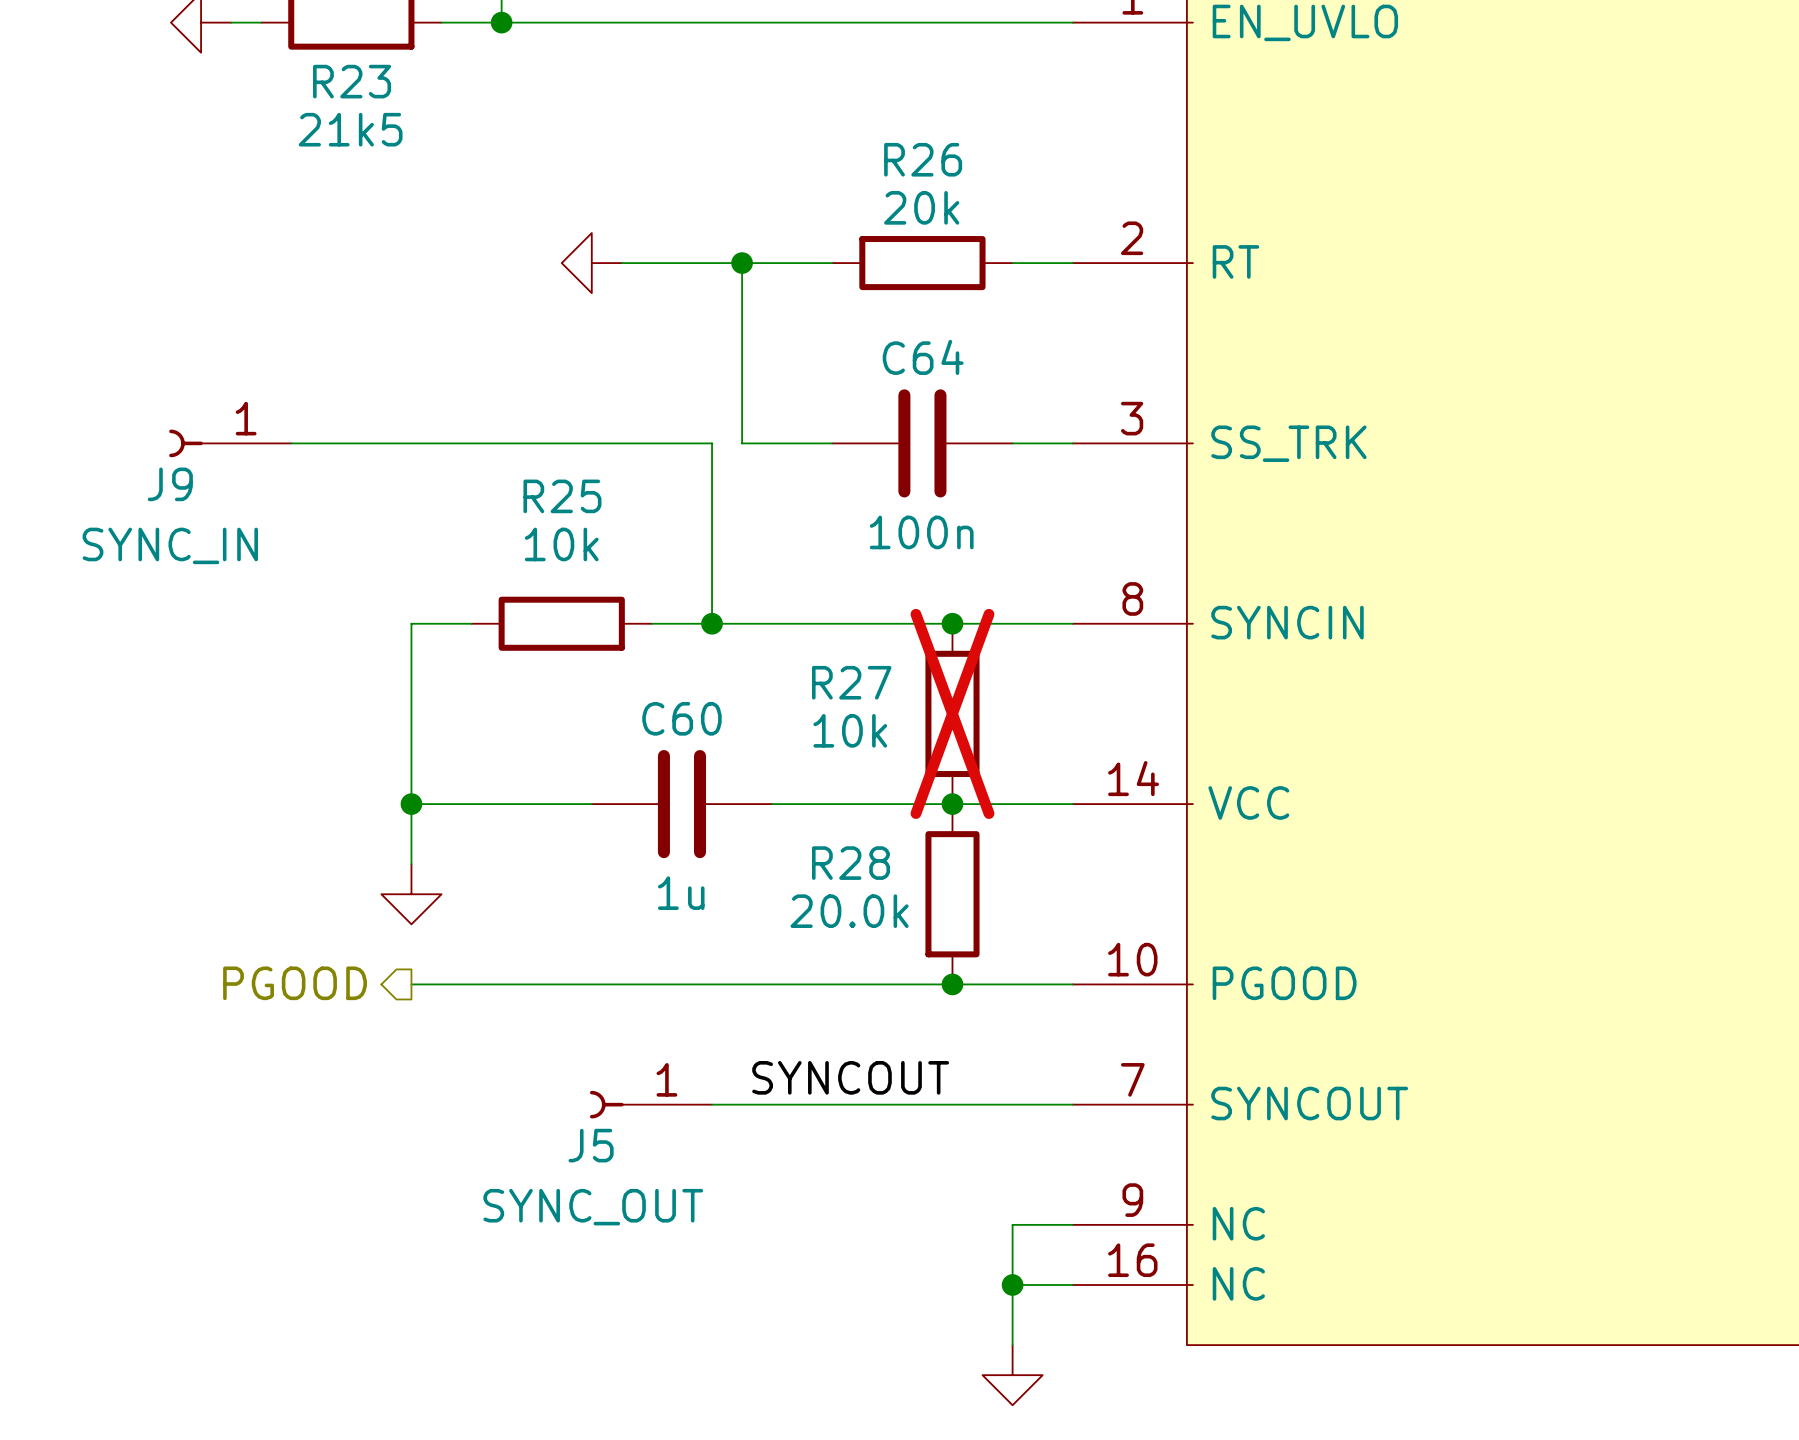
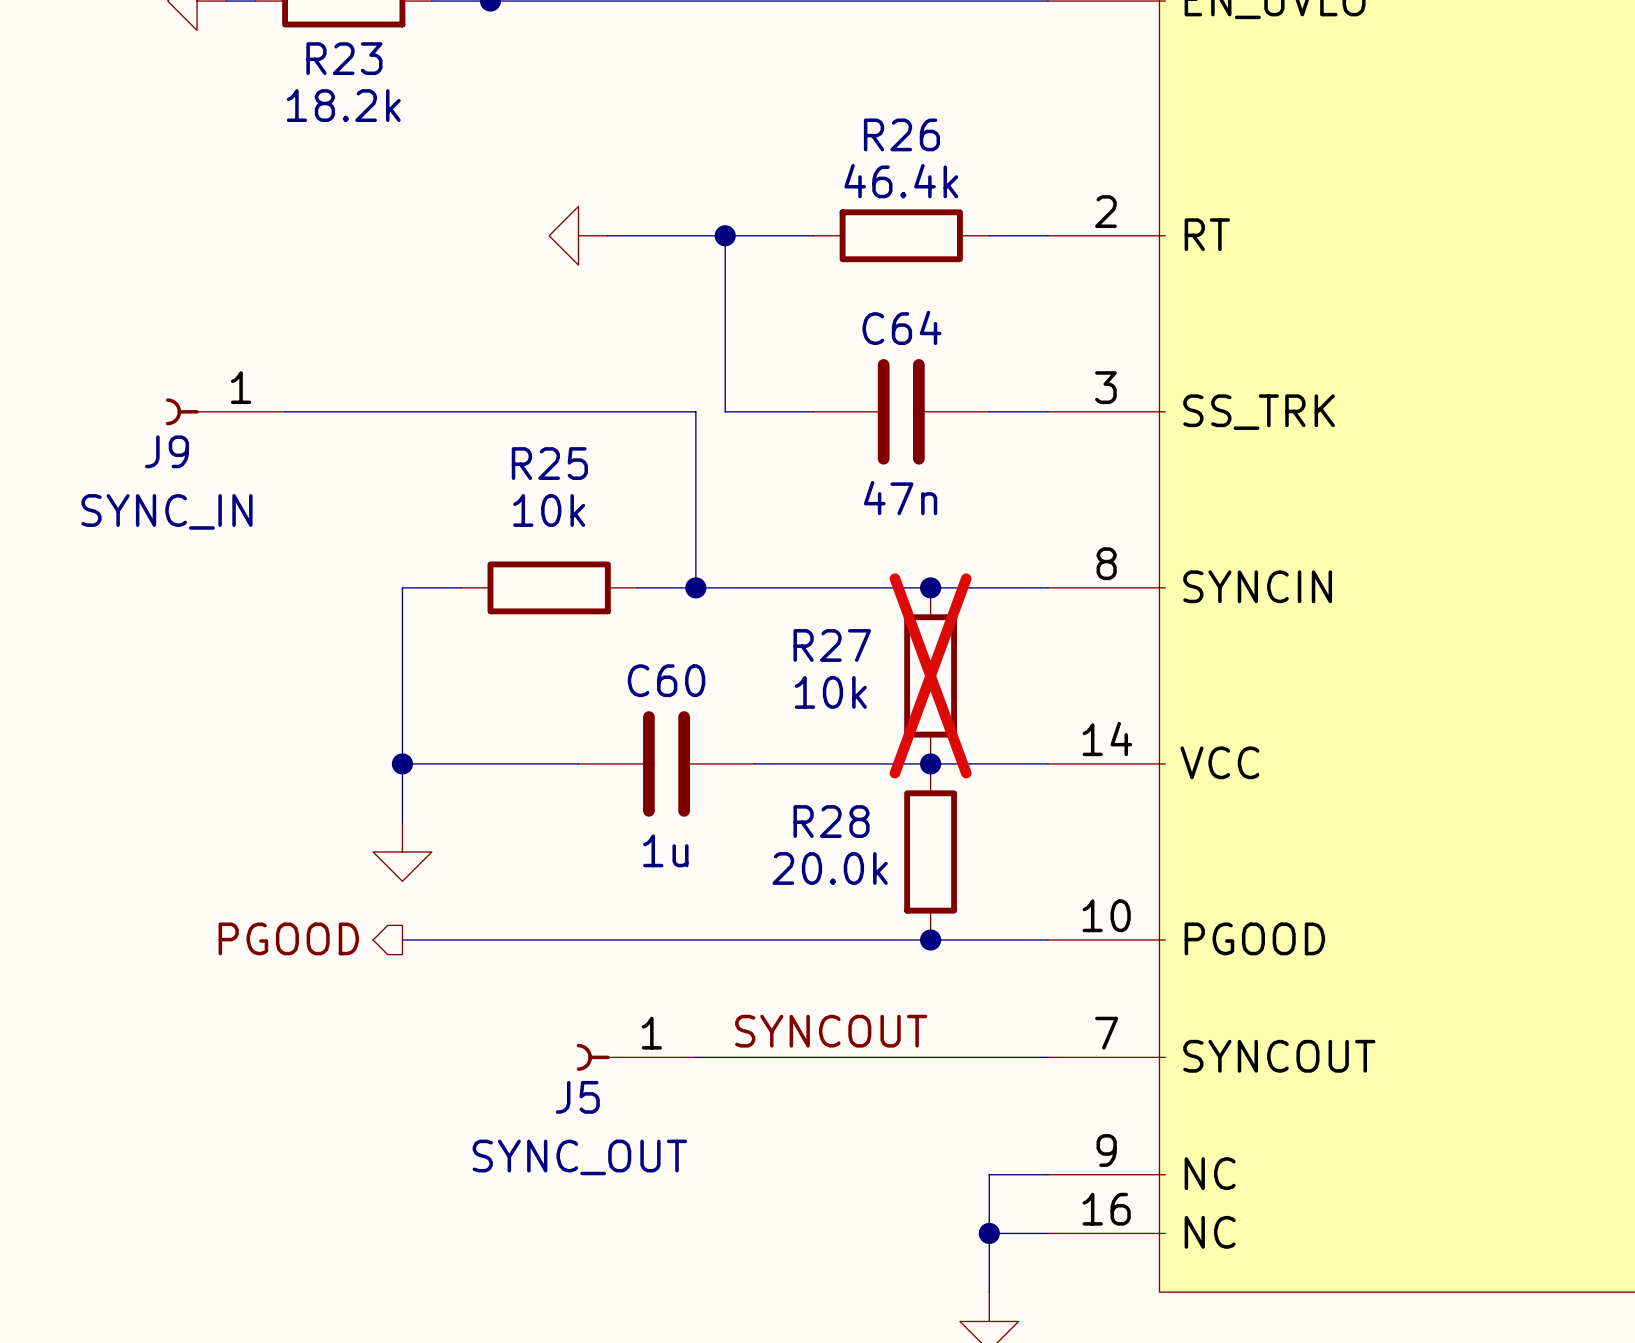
R23 value: 21k5 (350, 129) -> 18.2k (343, 105)
R26 value: 20k (921, 207) -> 46.4k (901, 181)
C64 value: 100n (921, 532) -> 47n (900, 498)

